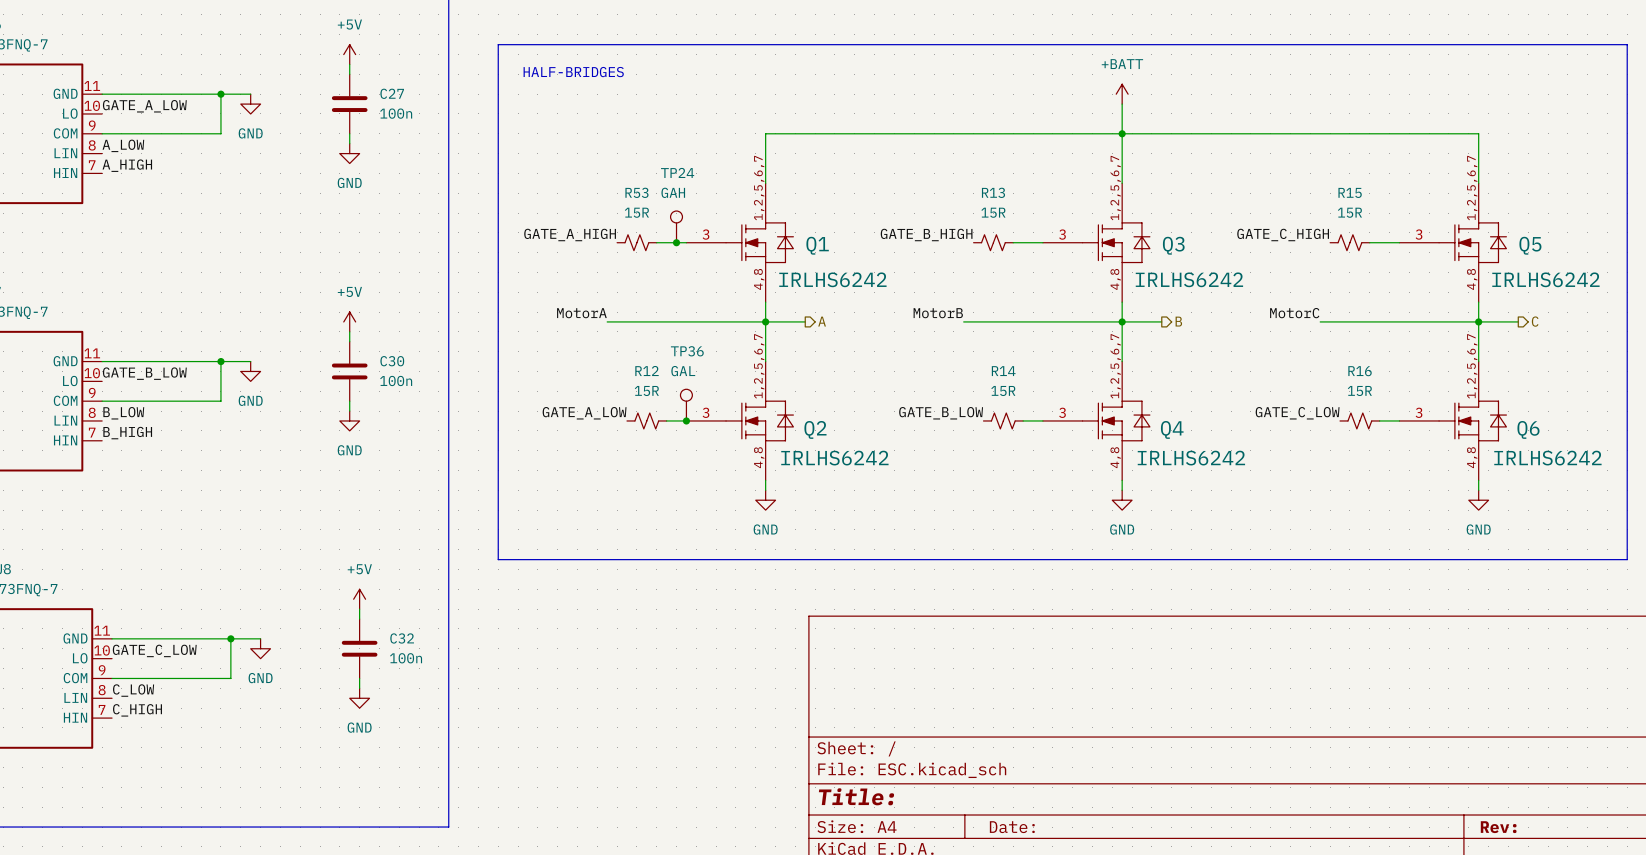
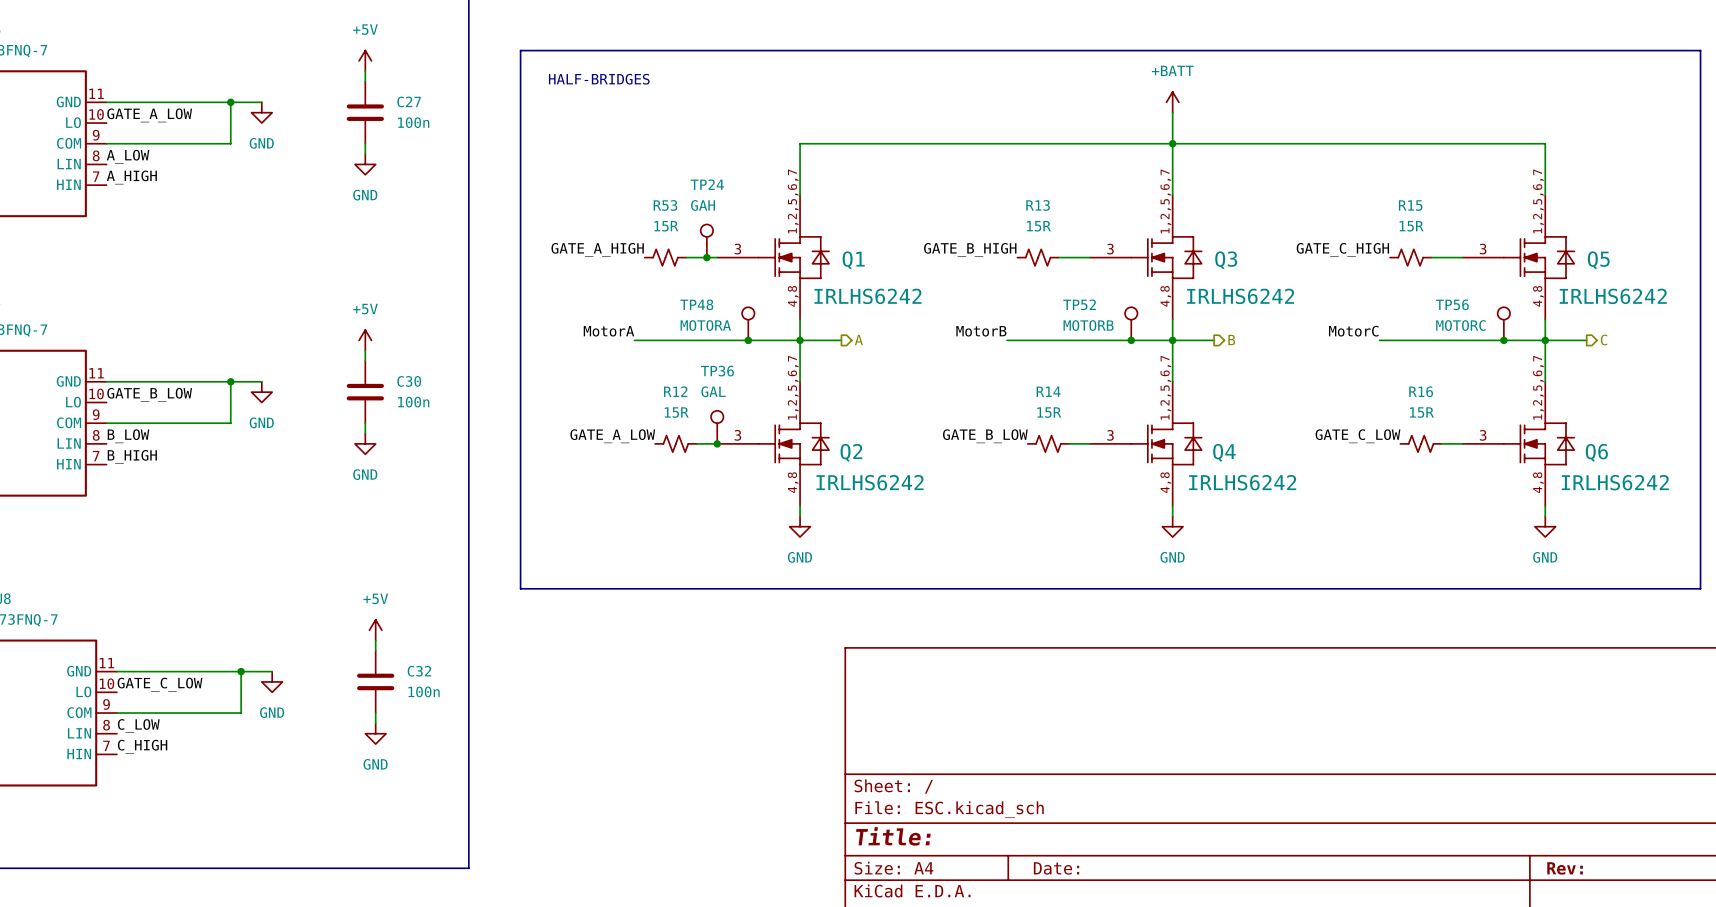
TP48: none -> MOTORA (748, 323)
TP52: none -> MOTORB (1131, 323)
TP56: none -> MOTORC (1503, 323)
junction: none -> (748, 340)
junction: none -> (1131, 340)
junction: none -> (1503, 340)

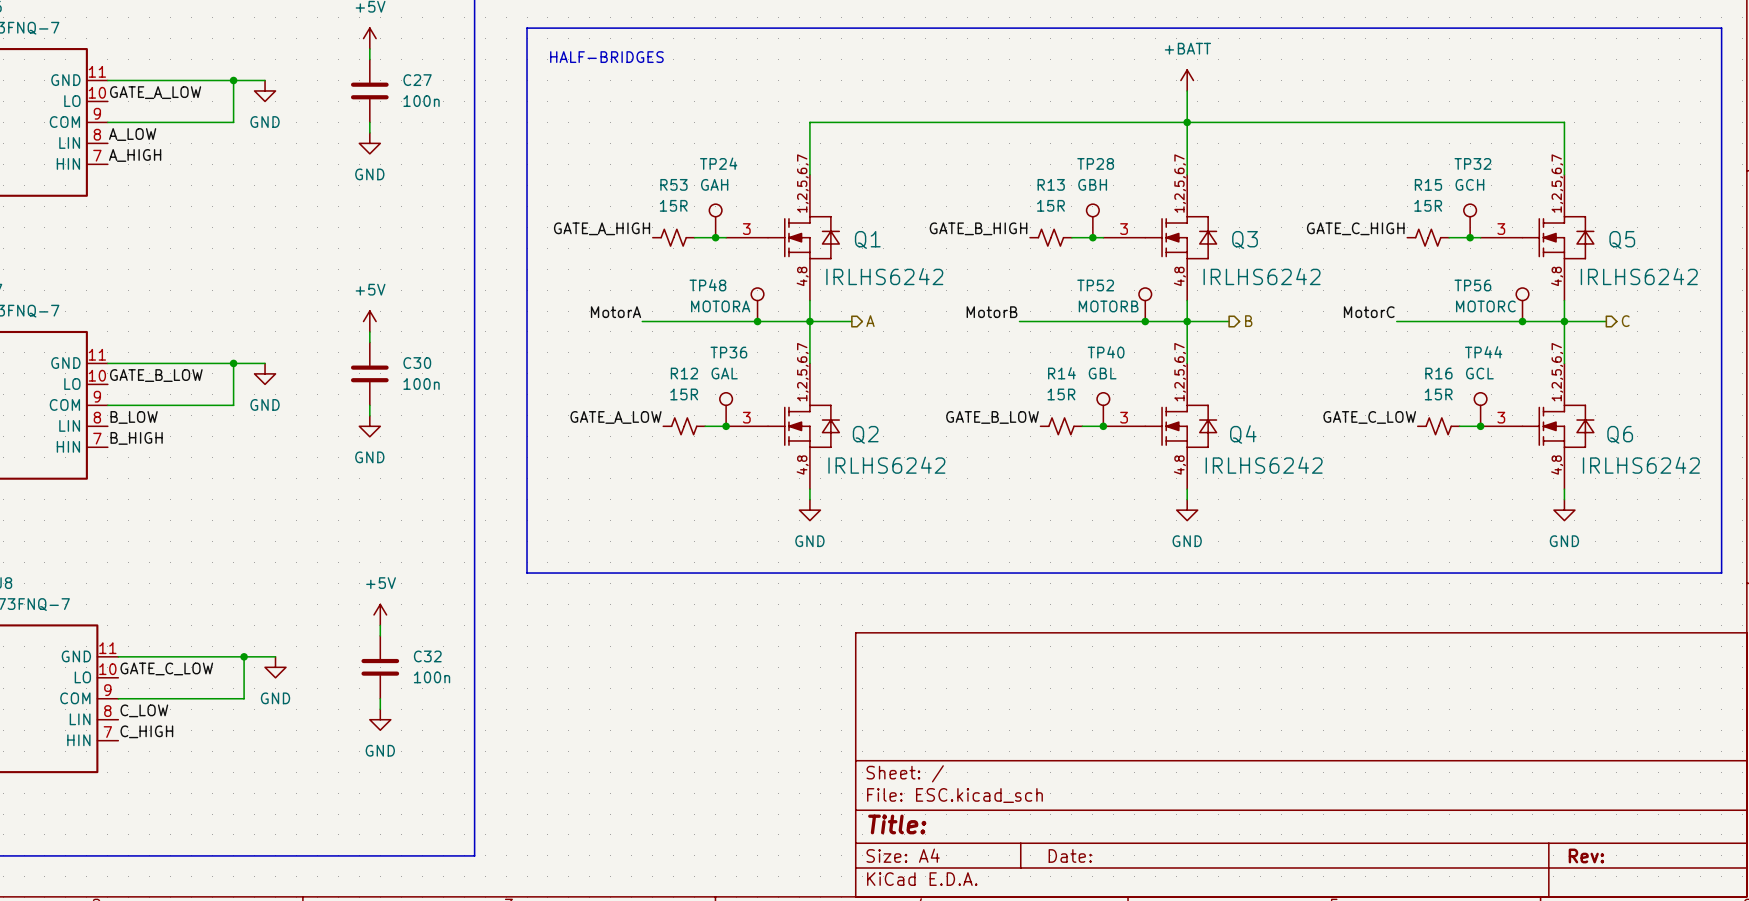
TP28: none -> GBH (1092, 220)
TP32: none -> GCH (1470, 220)
junction: none -> (1092, 237)
junction: none -> (1470, 237)
TP40: none -> GBL (1103, 409)
TP44: none -> GCL (1480, 409)
junction: none -> (1103, 426)
junction: none -> (1480, 426)

